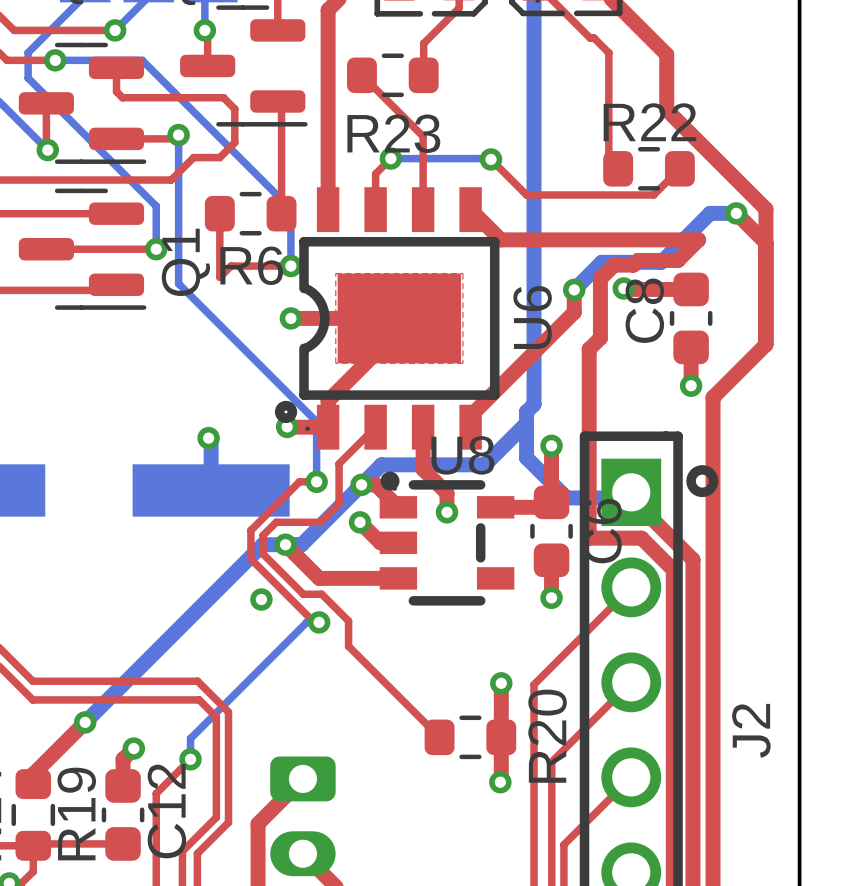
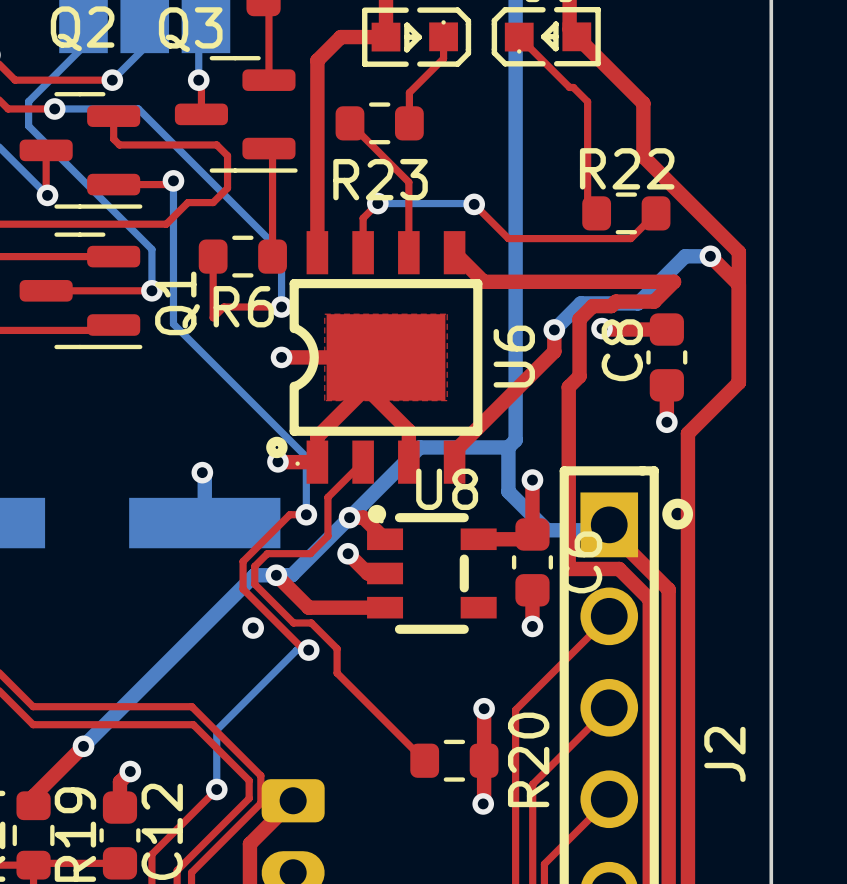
bottom track: (526, 423) (485, 464) (381, 464) -> (508, 447) (419, 447) (368, 498)
top track: (423, 427) (423, 469) (447, 493) (447, 512) -> (408, 462) (408, 430) (366, 388)
via: (447, 512) -> none
bottom track: (223, 705) (190, 738) (190, 759) -> (216, 730) (216, 789)
top track: (228, 712) (228, 822) -> (221, 736) (260, 775) (260, 803) (221, 842)
top track: (216, 717) (216, 817) -> (209, 741) (249, 780) (249, 798) (209, 837)
top track: (190, 759) (156, 793) (156, 834) -> (216, 789) (151, 854)
via position: (190, 759) -> (216, 789)

